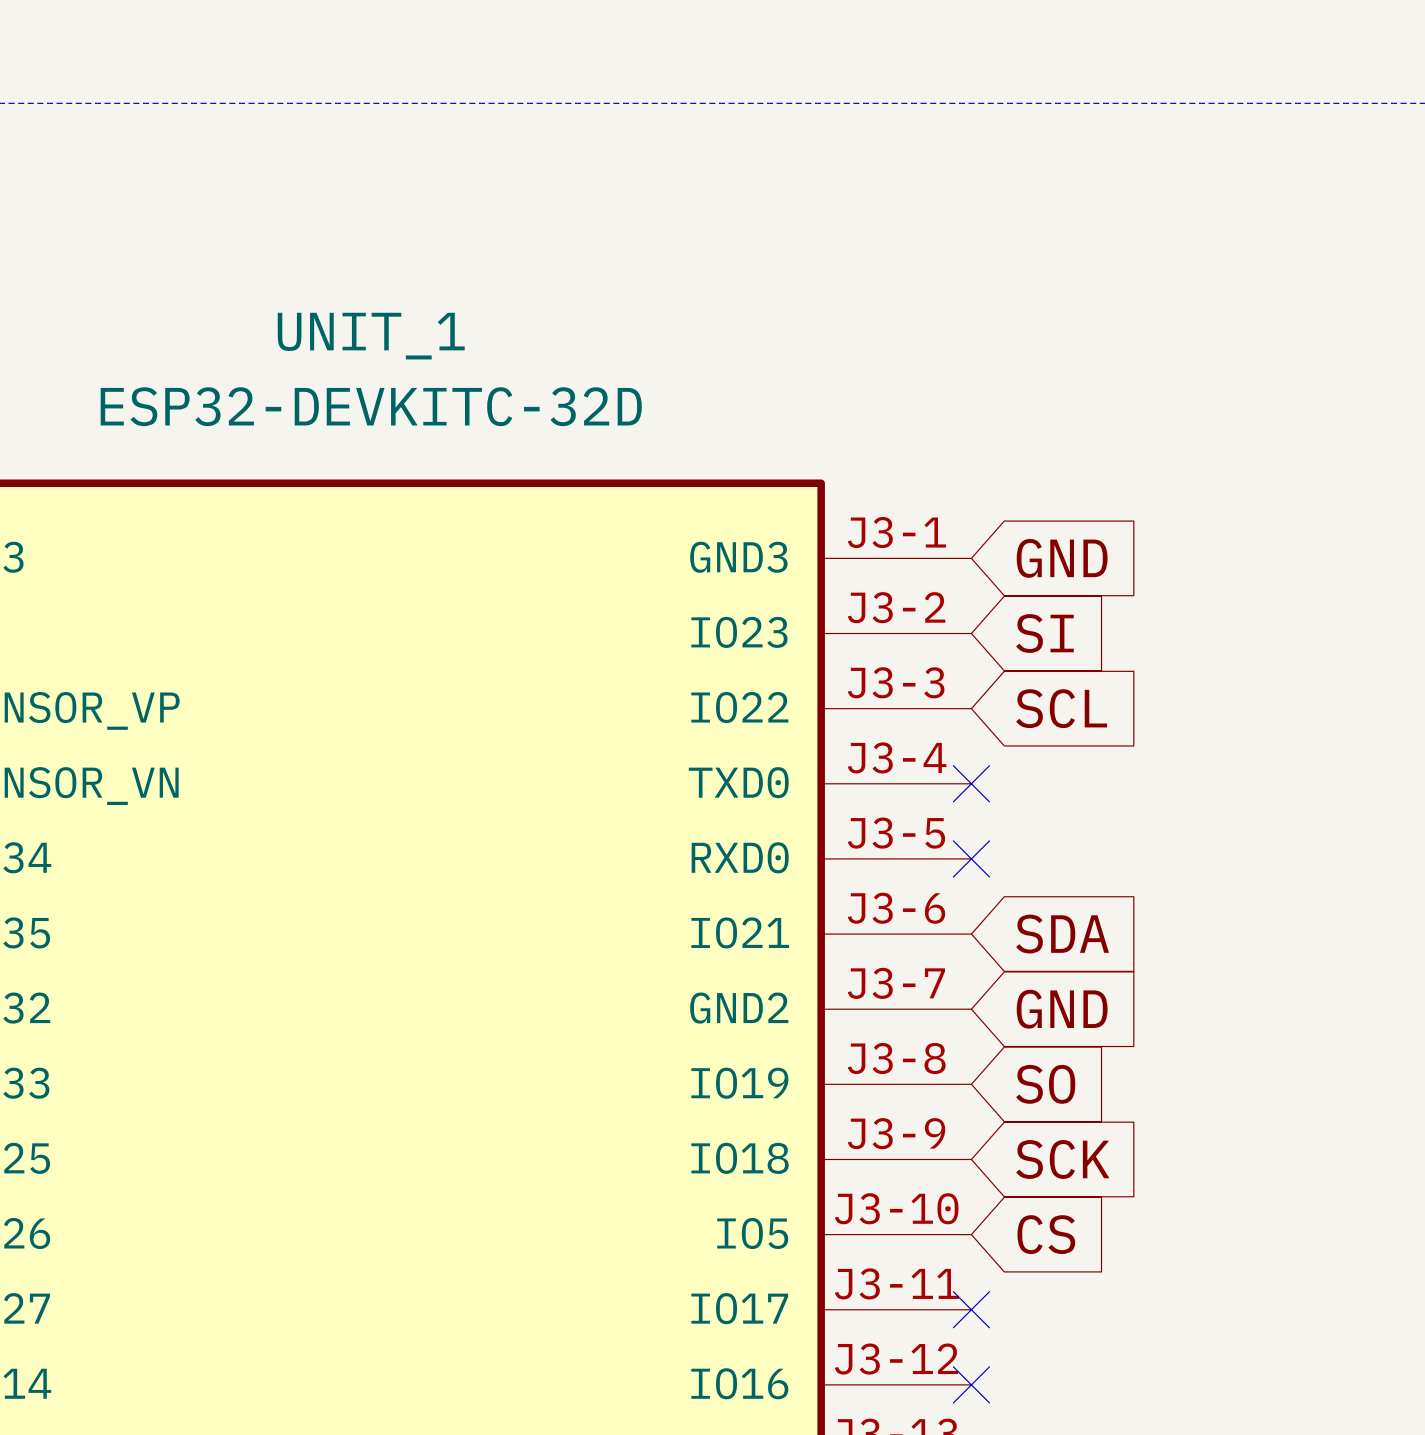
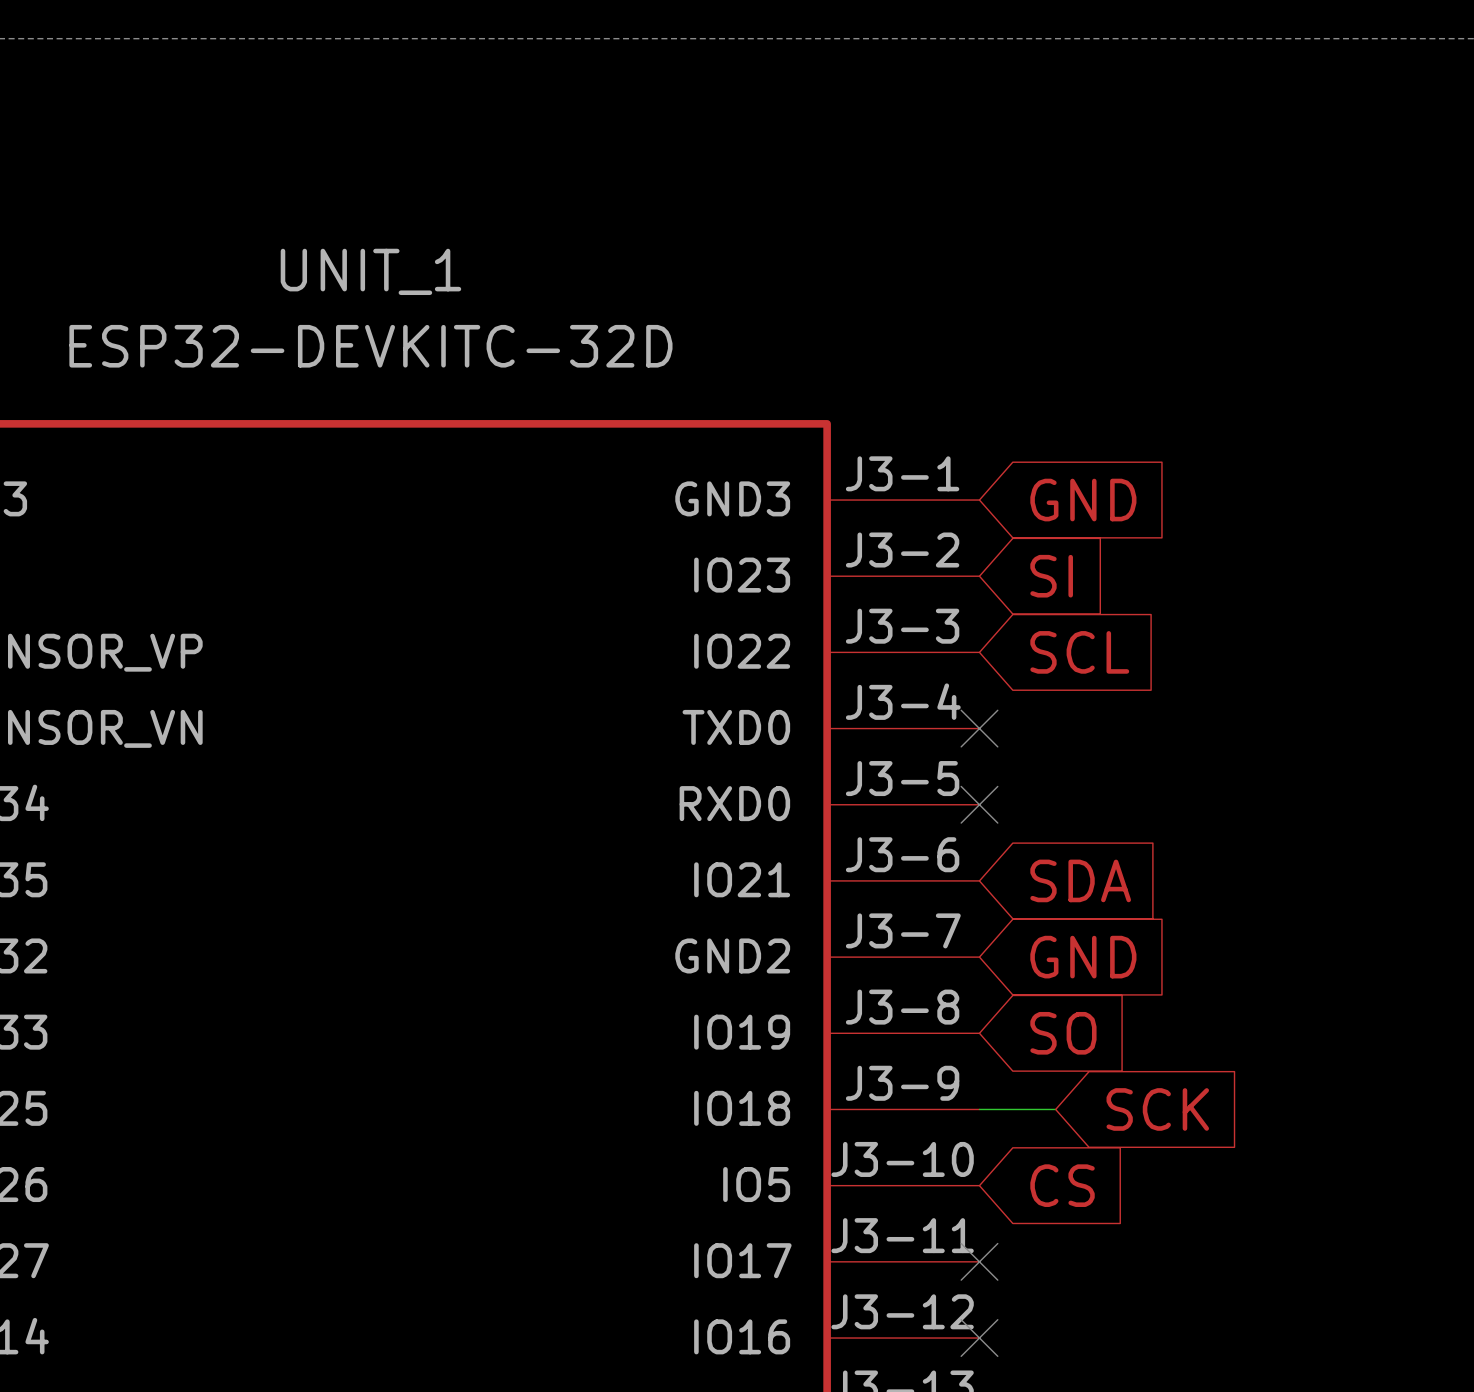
wire: none -> (979, 1109) (1055, 1109)
global label position: SCK (1062, 1159) -> SCK (1157, 1109)

